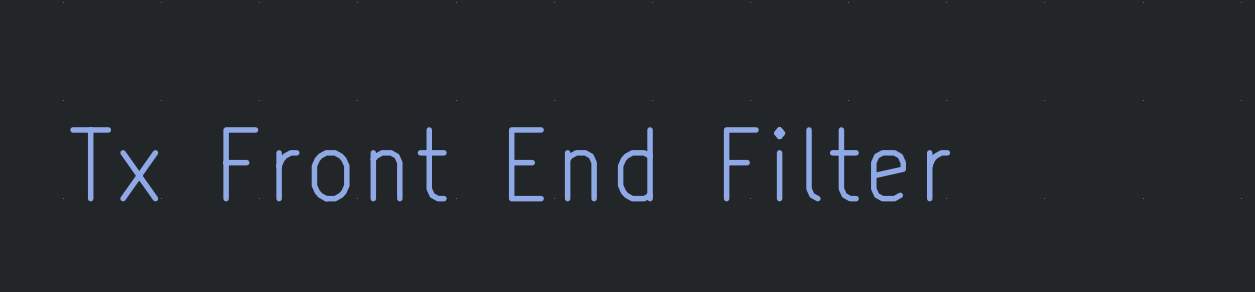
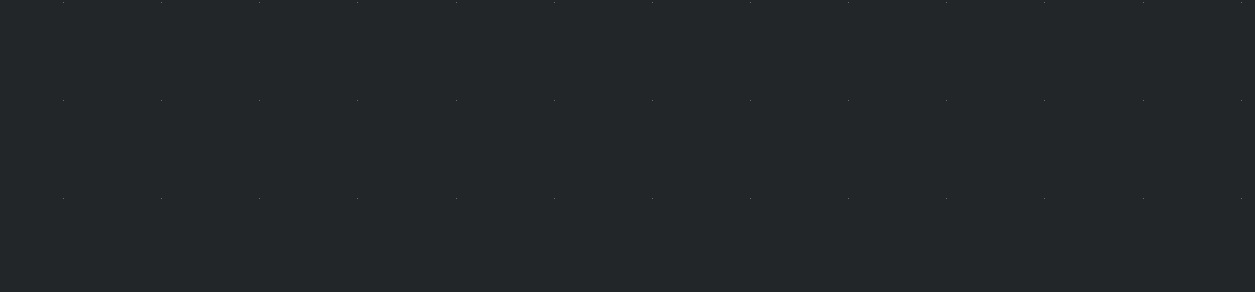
text: Tx Front End Filter (510, 164) -> none

